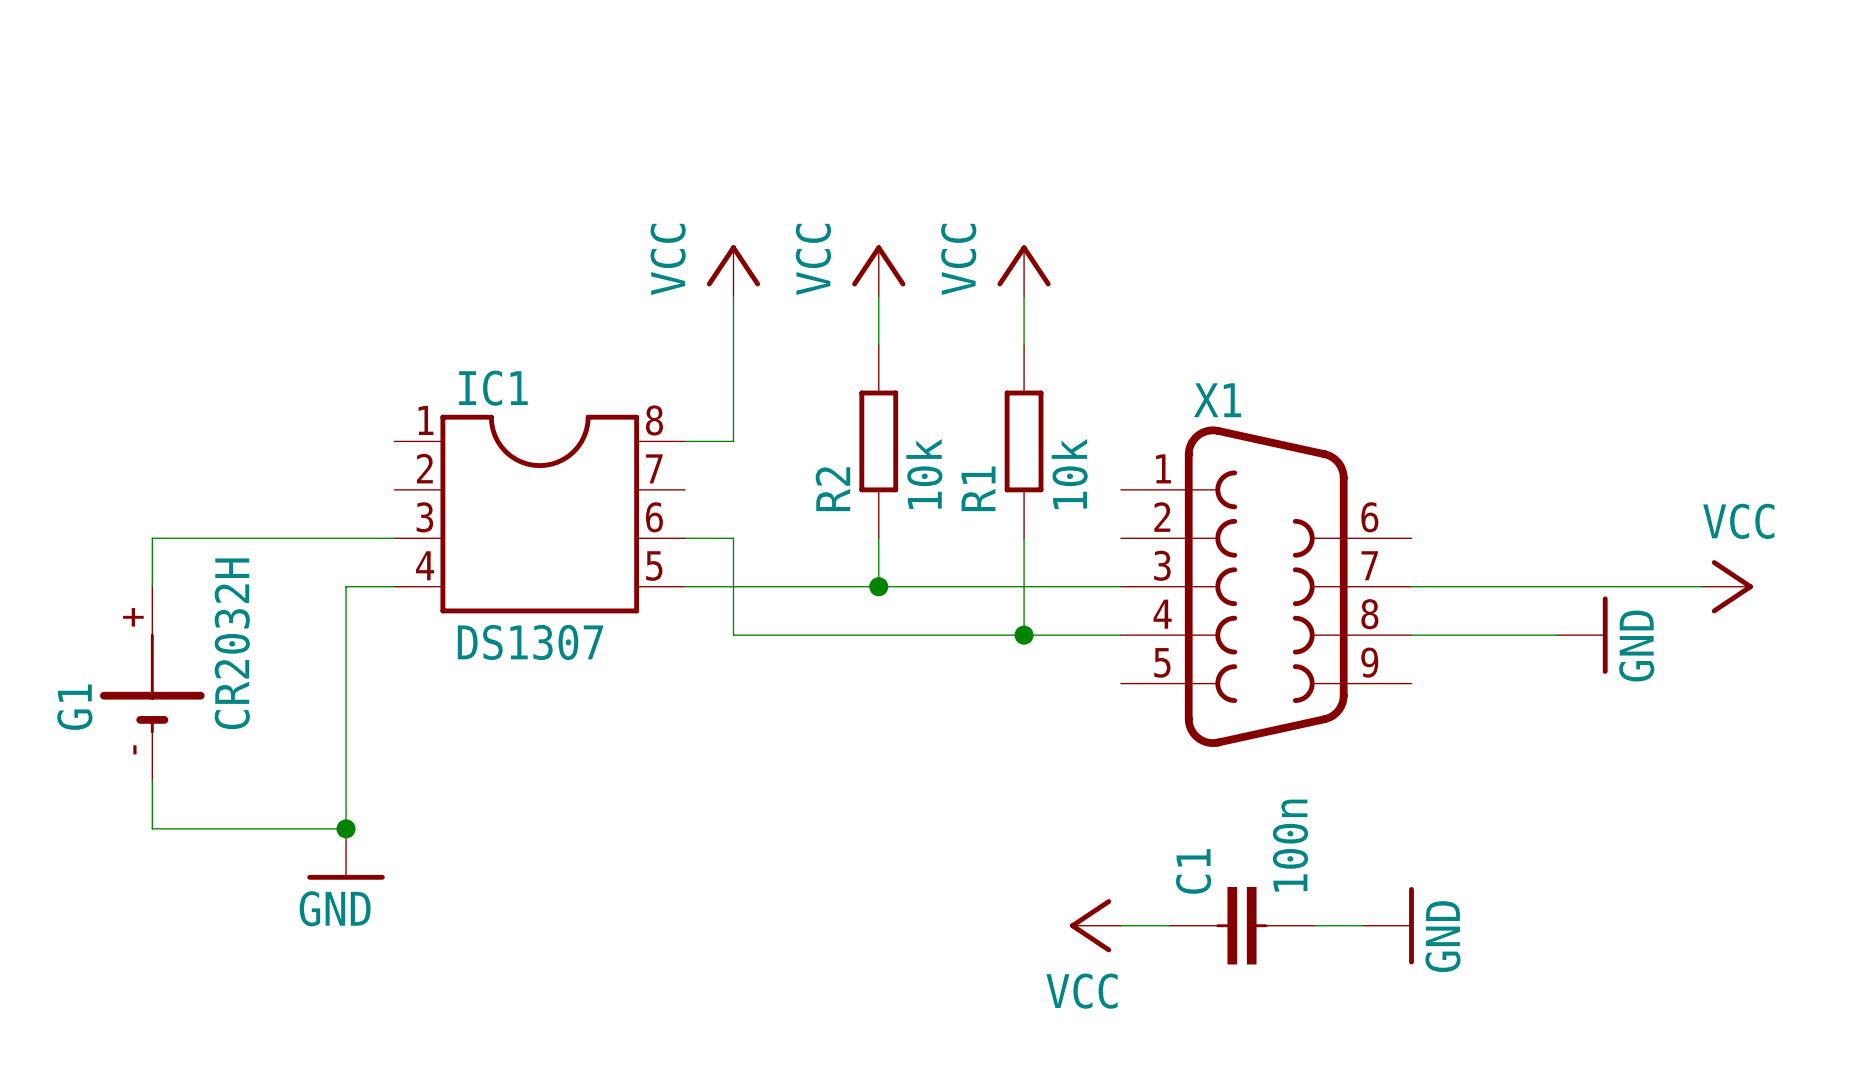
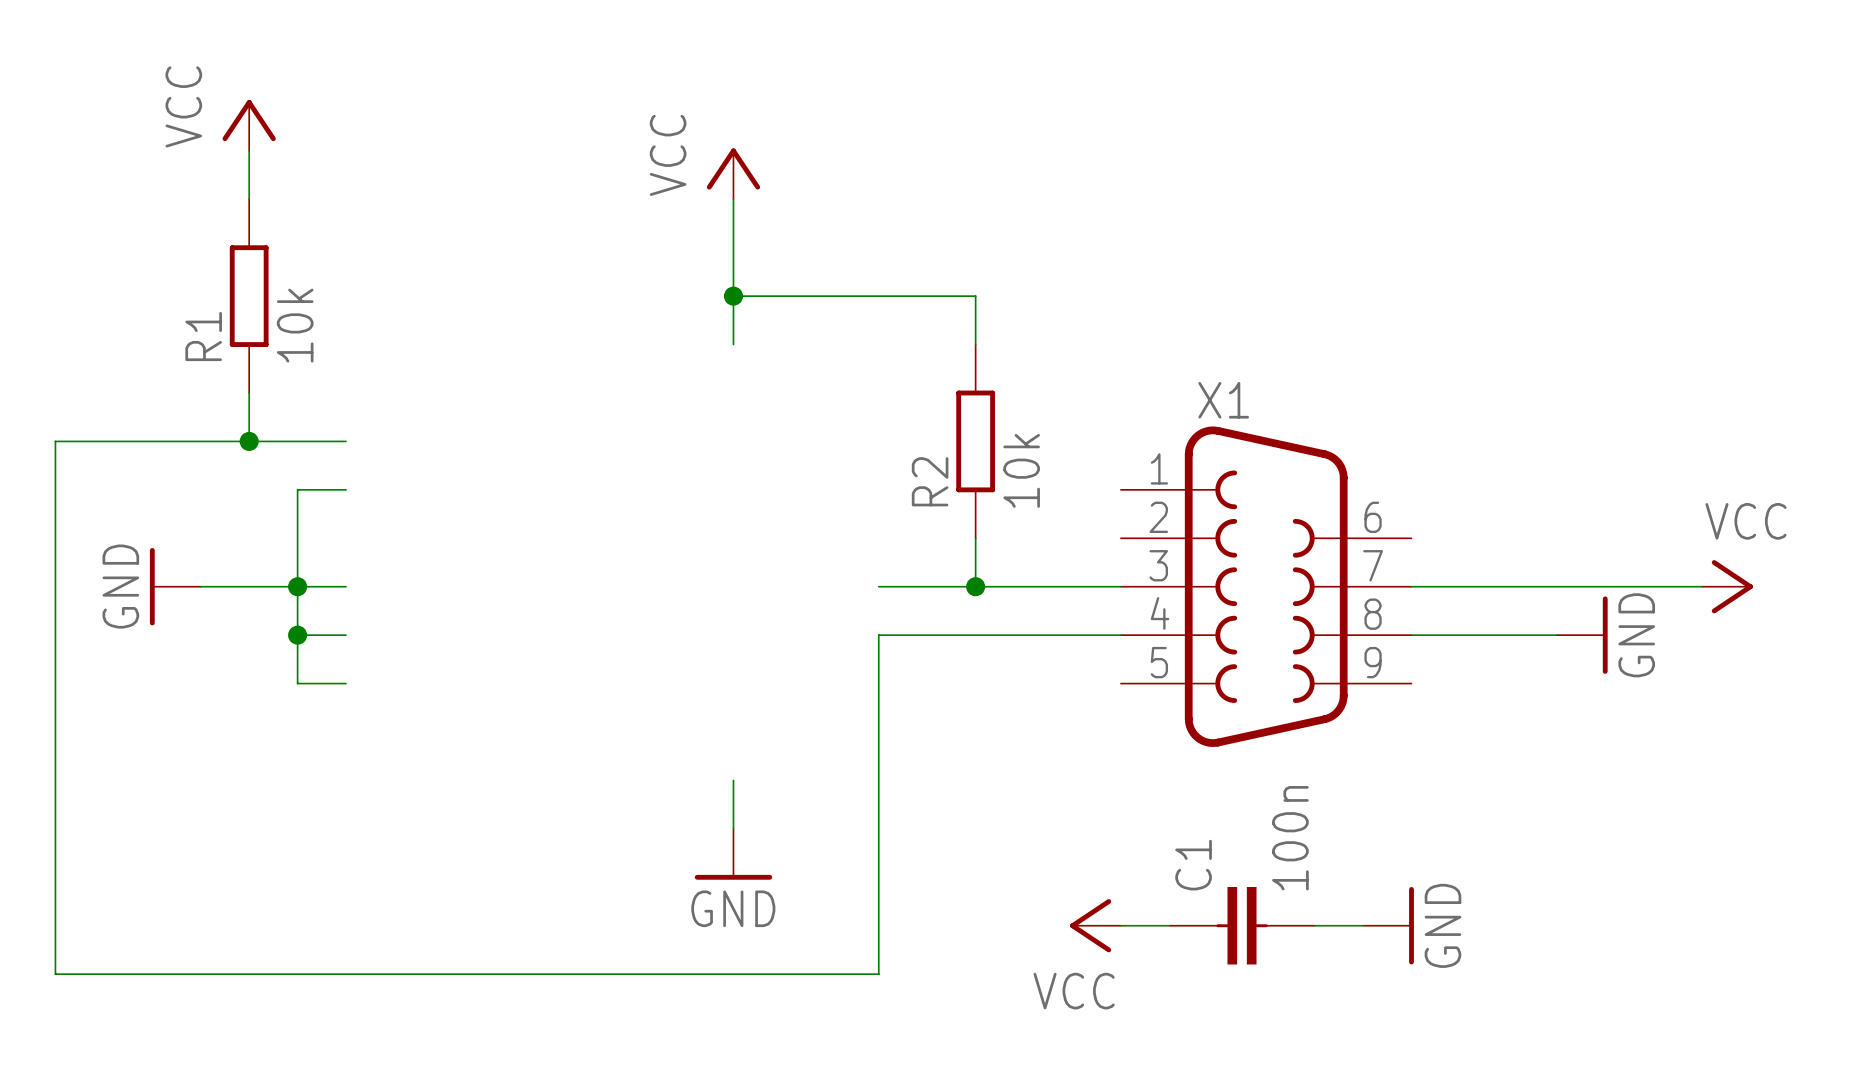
power symbol: none -> VCC (249, 125)
wire: none -> (249, 150) (249, 199)
power symbol: none -> VCC (733, 173)
wire: none -> (733, 199) (733, 296) (975, 296) (975, 344)
power symbol: VCC (733, 270) -> none
power symbol: VCC (878, 270) -> none
power symbol: VCC (1024, 270) -> none
junction: none -> (733, 296)
wire: (878, 296) (878, 344) -> none
wire: (1024, 296) (1024, 344) -> (975, 538) (975, 586)
wire: (733, 344) (733, 441) (685, 441) -> none
wire: none -> (249, 393) (249, 441)
junction: none -> (249, 441)
R2 position: (878, 441) -> (975, 441)
R1 position: (1024, 441) -> (249, 296)
wire: none -> (346, 489) (297, 489) (297, 683) (346, 683)
IC1: DS1307 (539, 514) -> none
wire: (394, 538) (152, 538) (152, 586) -> none
wire: (685, 538) (733, 538) (733, 635) (878, 635) -> (346, 441) (55, 441) (55, 974) (878, 974) (878, 635)
wire: (878, 538) (878, 586) (685, 586) -> none
wire: (1024, 538) (1024, 635) -> none
power symbol: none -> GND (175, 586)
wire: none -> (200, 586) (346, 586)
junction: none -> (297, 586)
wire: (394, 586) (346, 586) (346, 828) (152, 828) (152, 780) -> none
junction: (878, 586) -> none
junction: none -> (975, 586)
wire: none -> (297, 635) (346, 635)
junction: none -> (297, 635)
junction: (1024, 635) -> none
G1: CR2032H (152, 683) -> none
wire: none -> (733, 780) (733, 828)
junction: (346, 828) -> none
power symbol: GND (346, 854) -> none
power symbol: none -> GND (733, 854)

